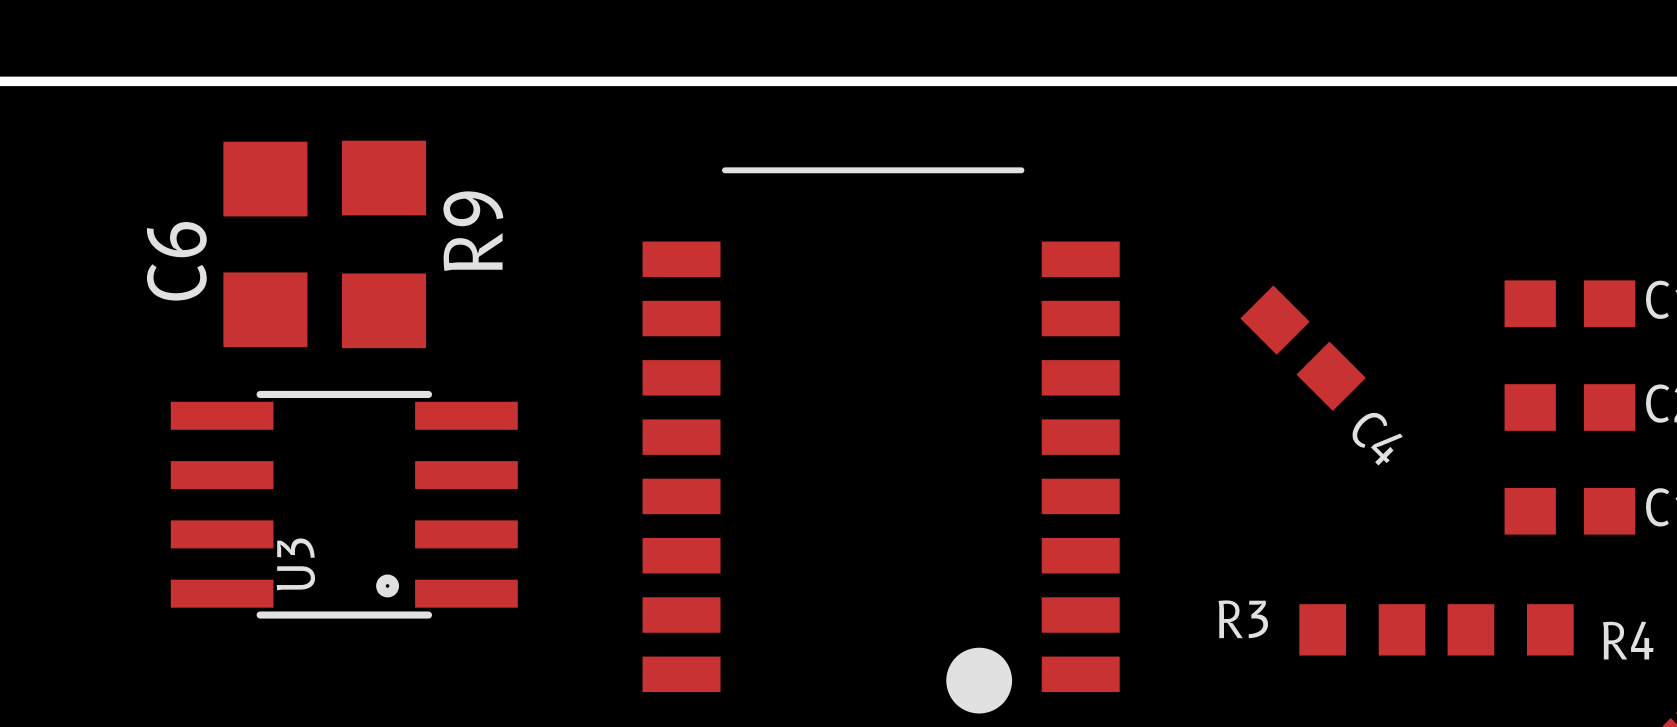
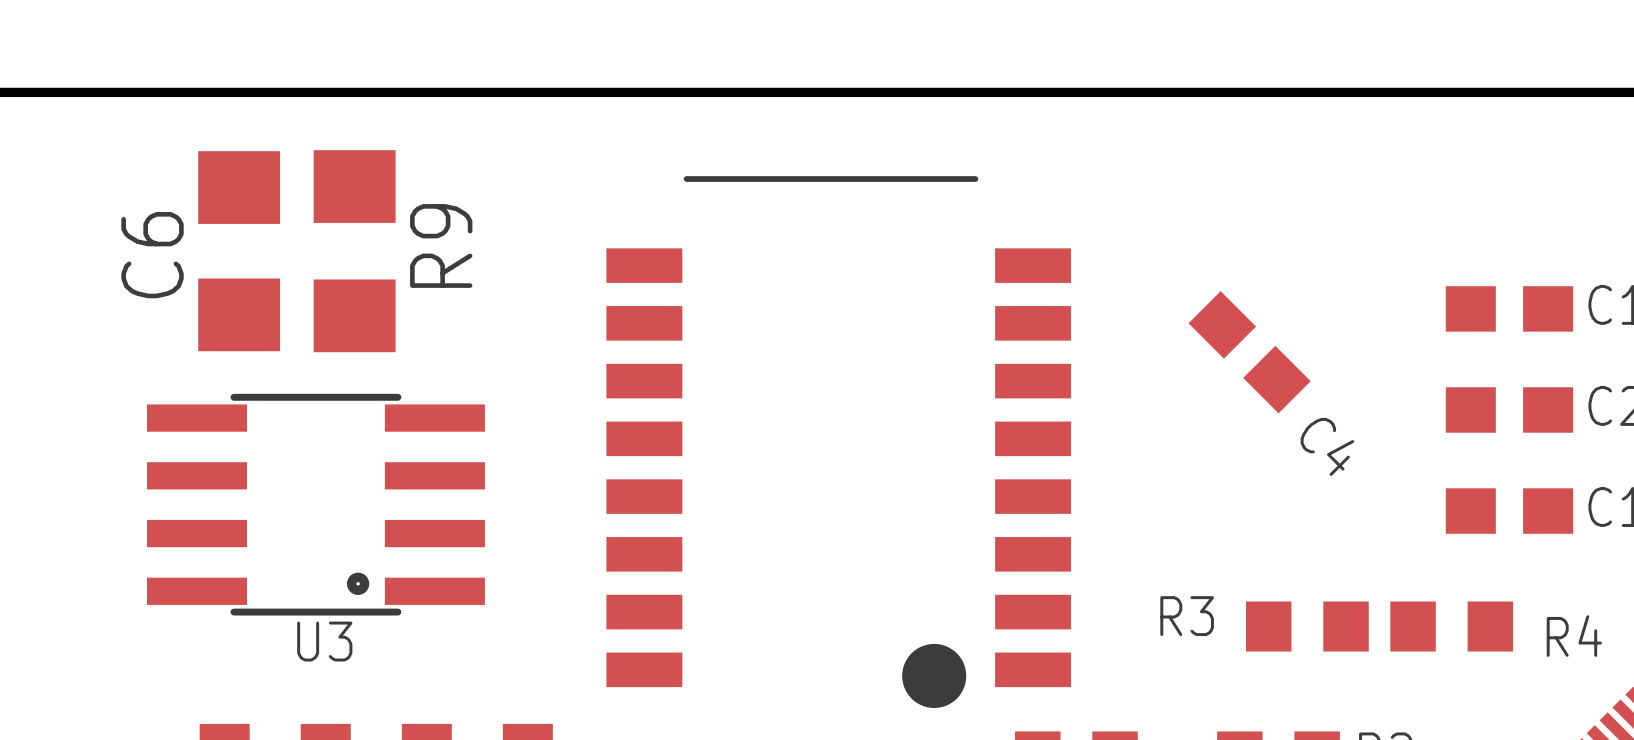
U3 name rotation: 0° (295, 564) -> 90° clockwise (324, 641)
U3 name position: U3 (295, 564) -> U3 (324, 641)

